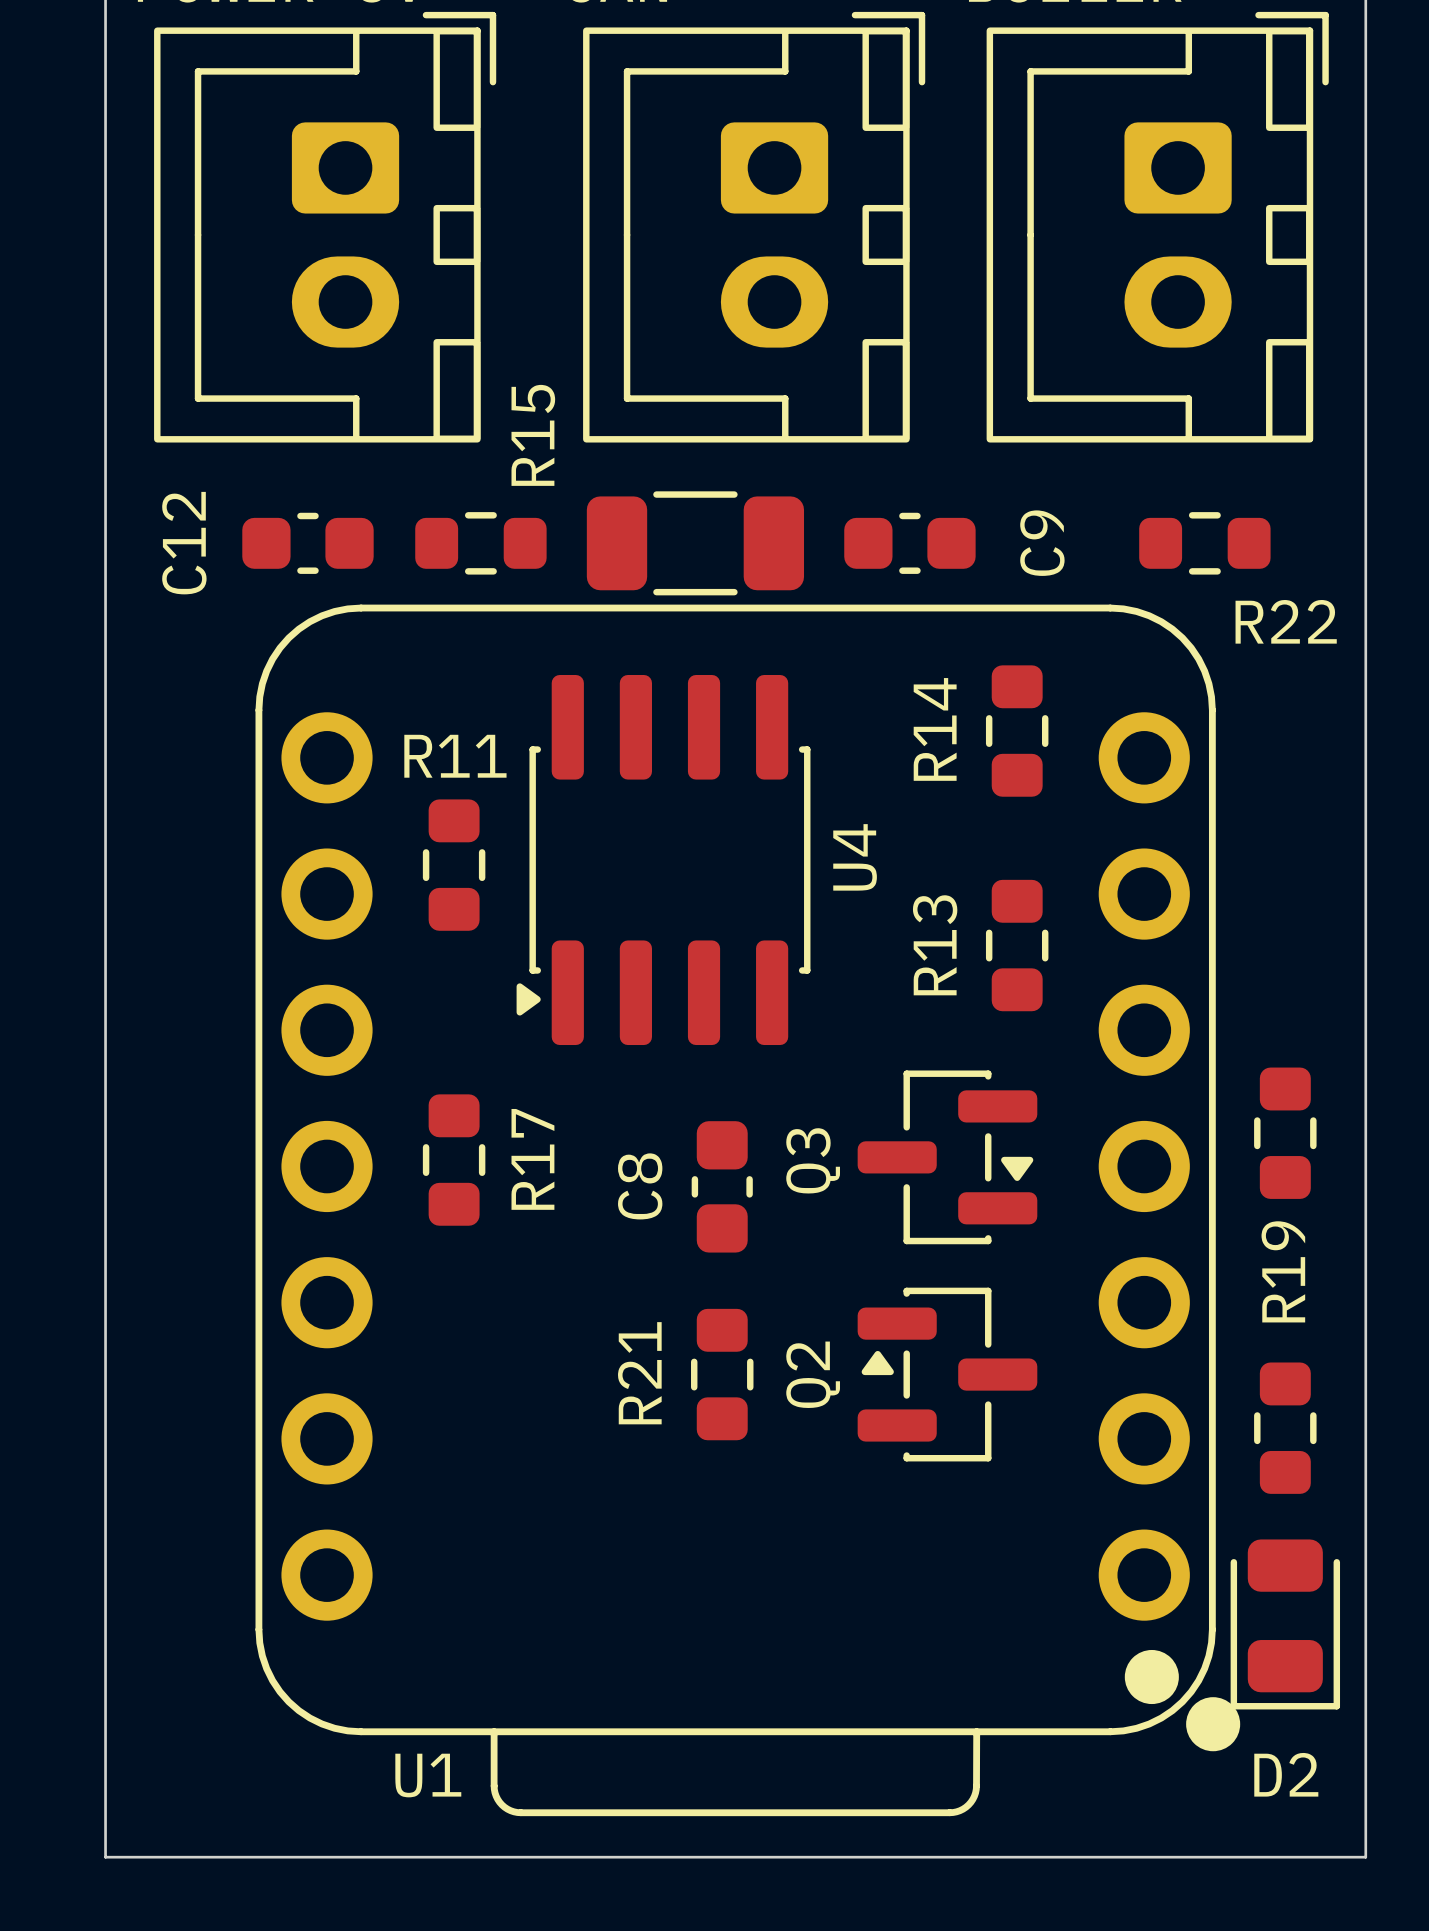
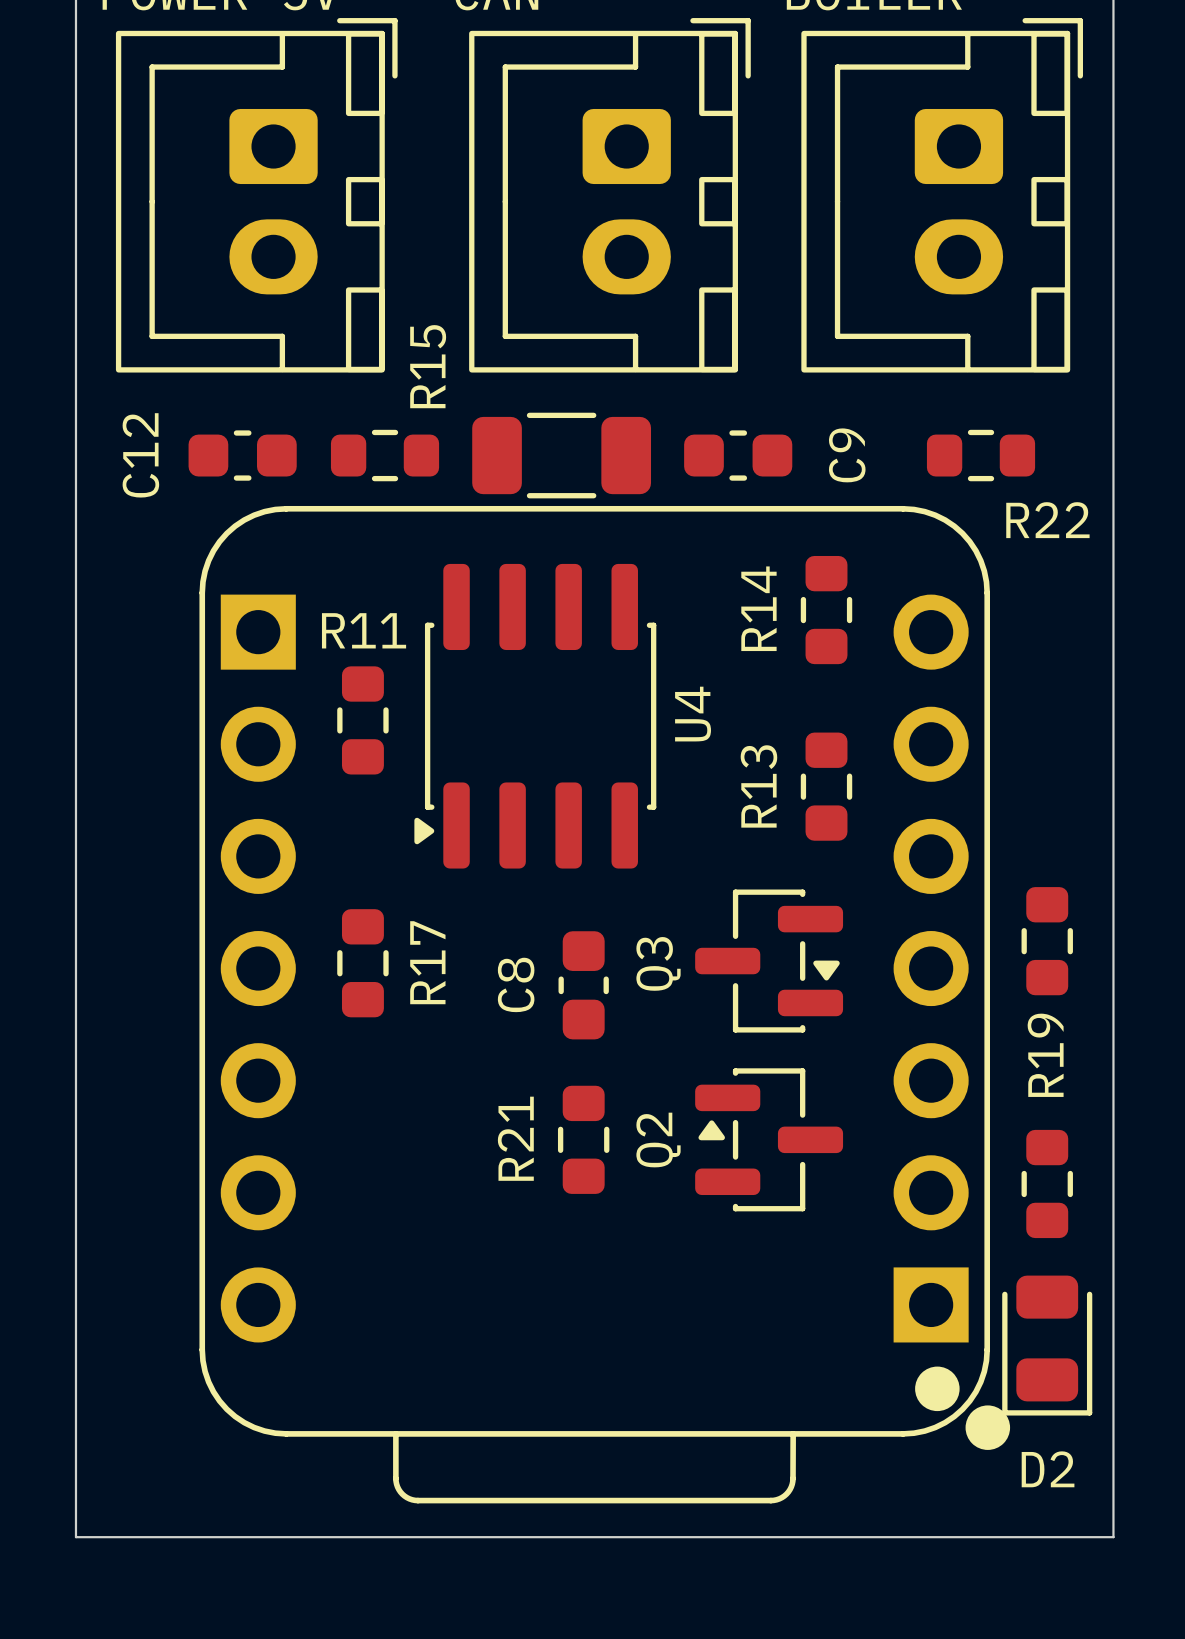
part: none -> (258, 968)
part: none -> (931, 968)
U1: (747, 1210) -> none

